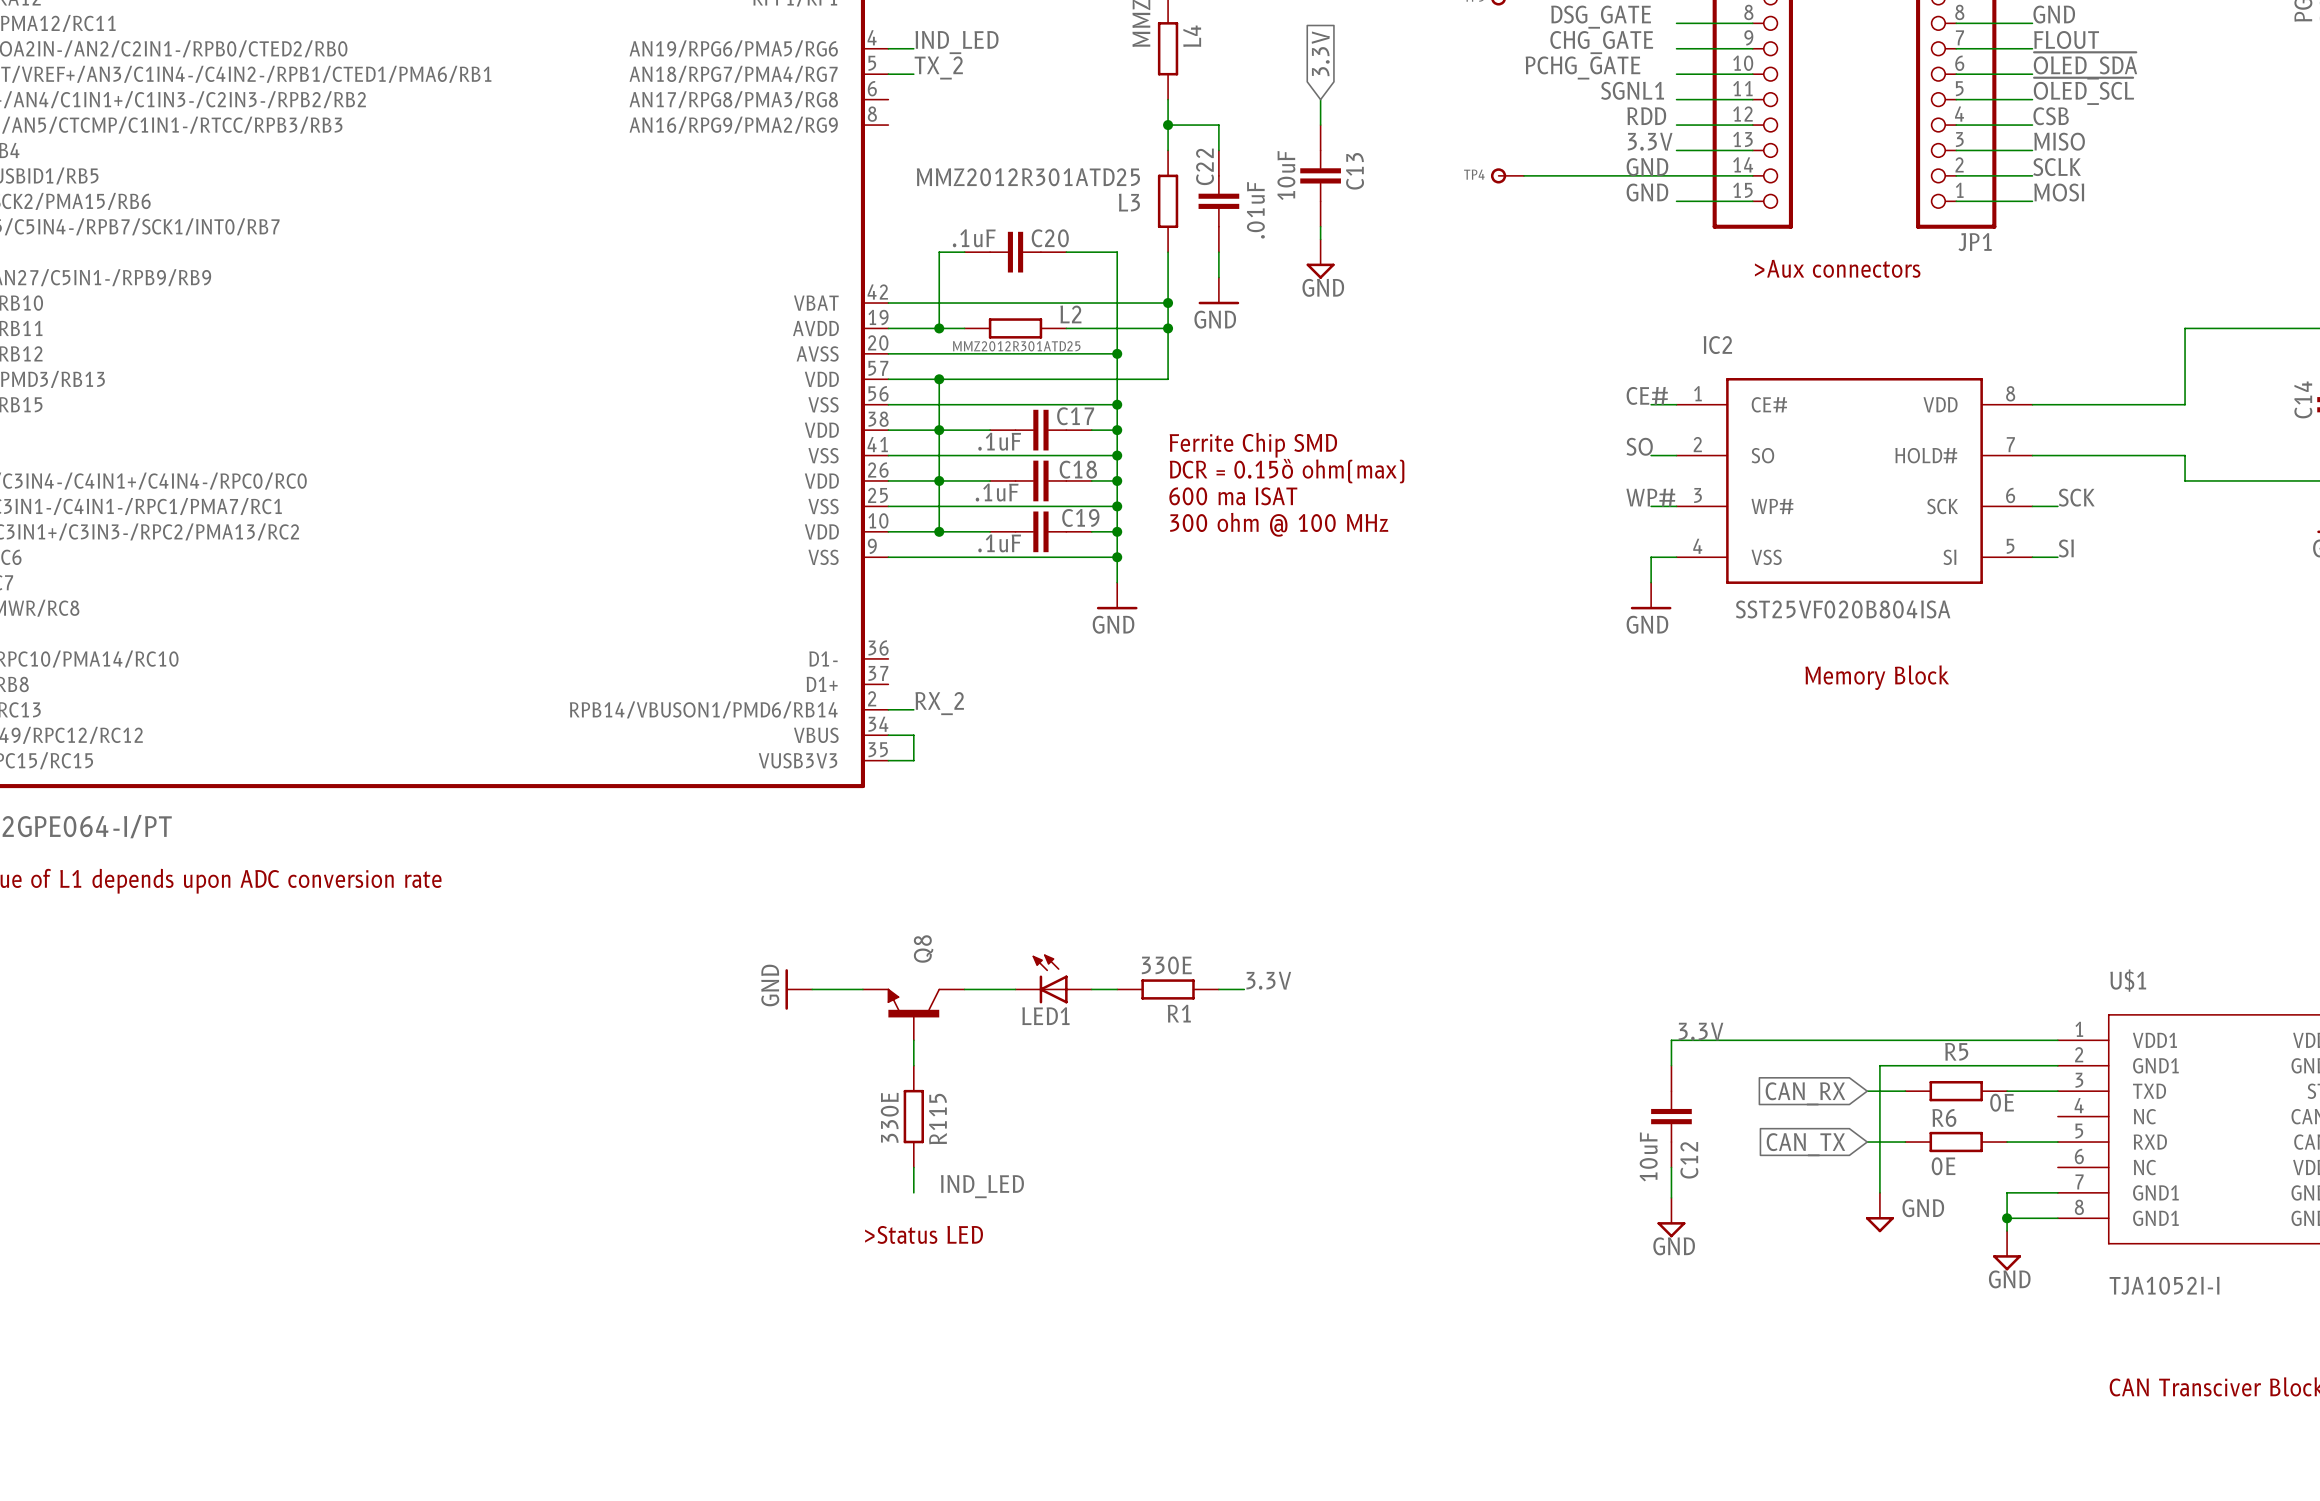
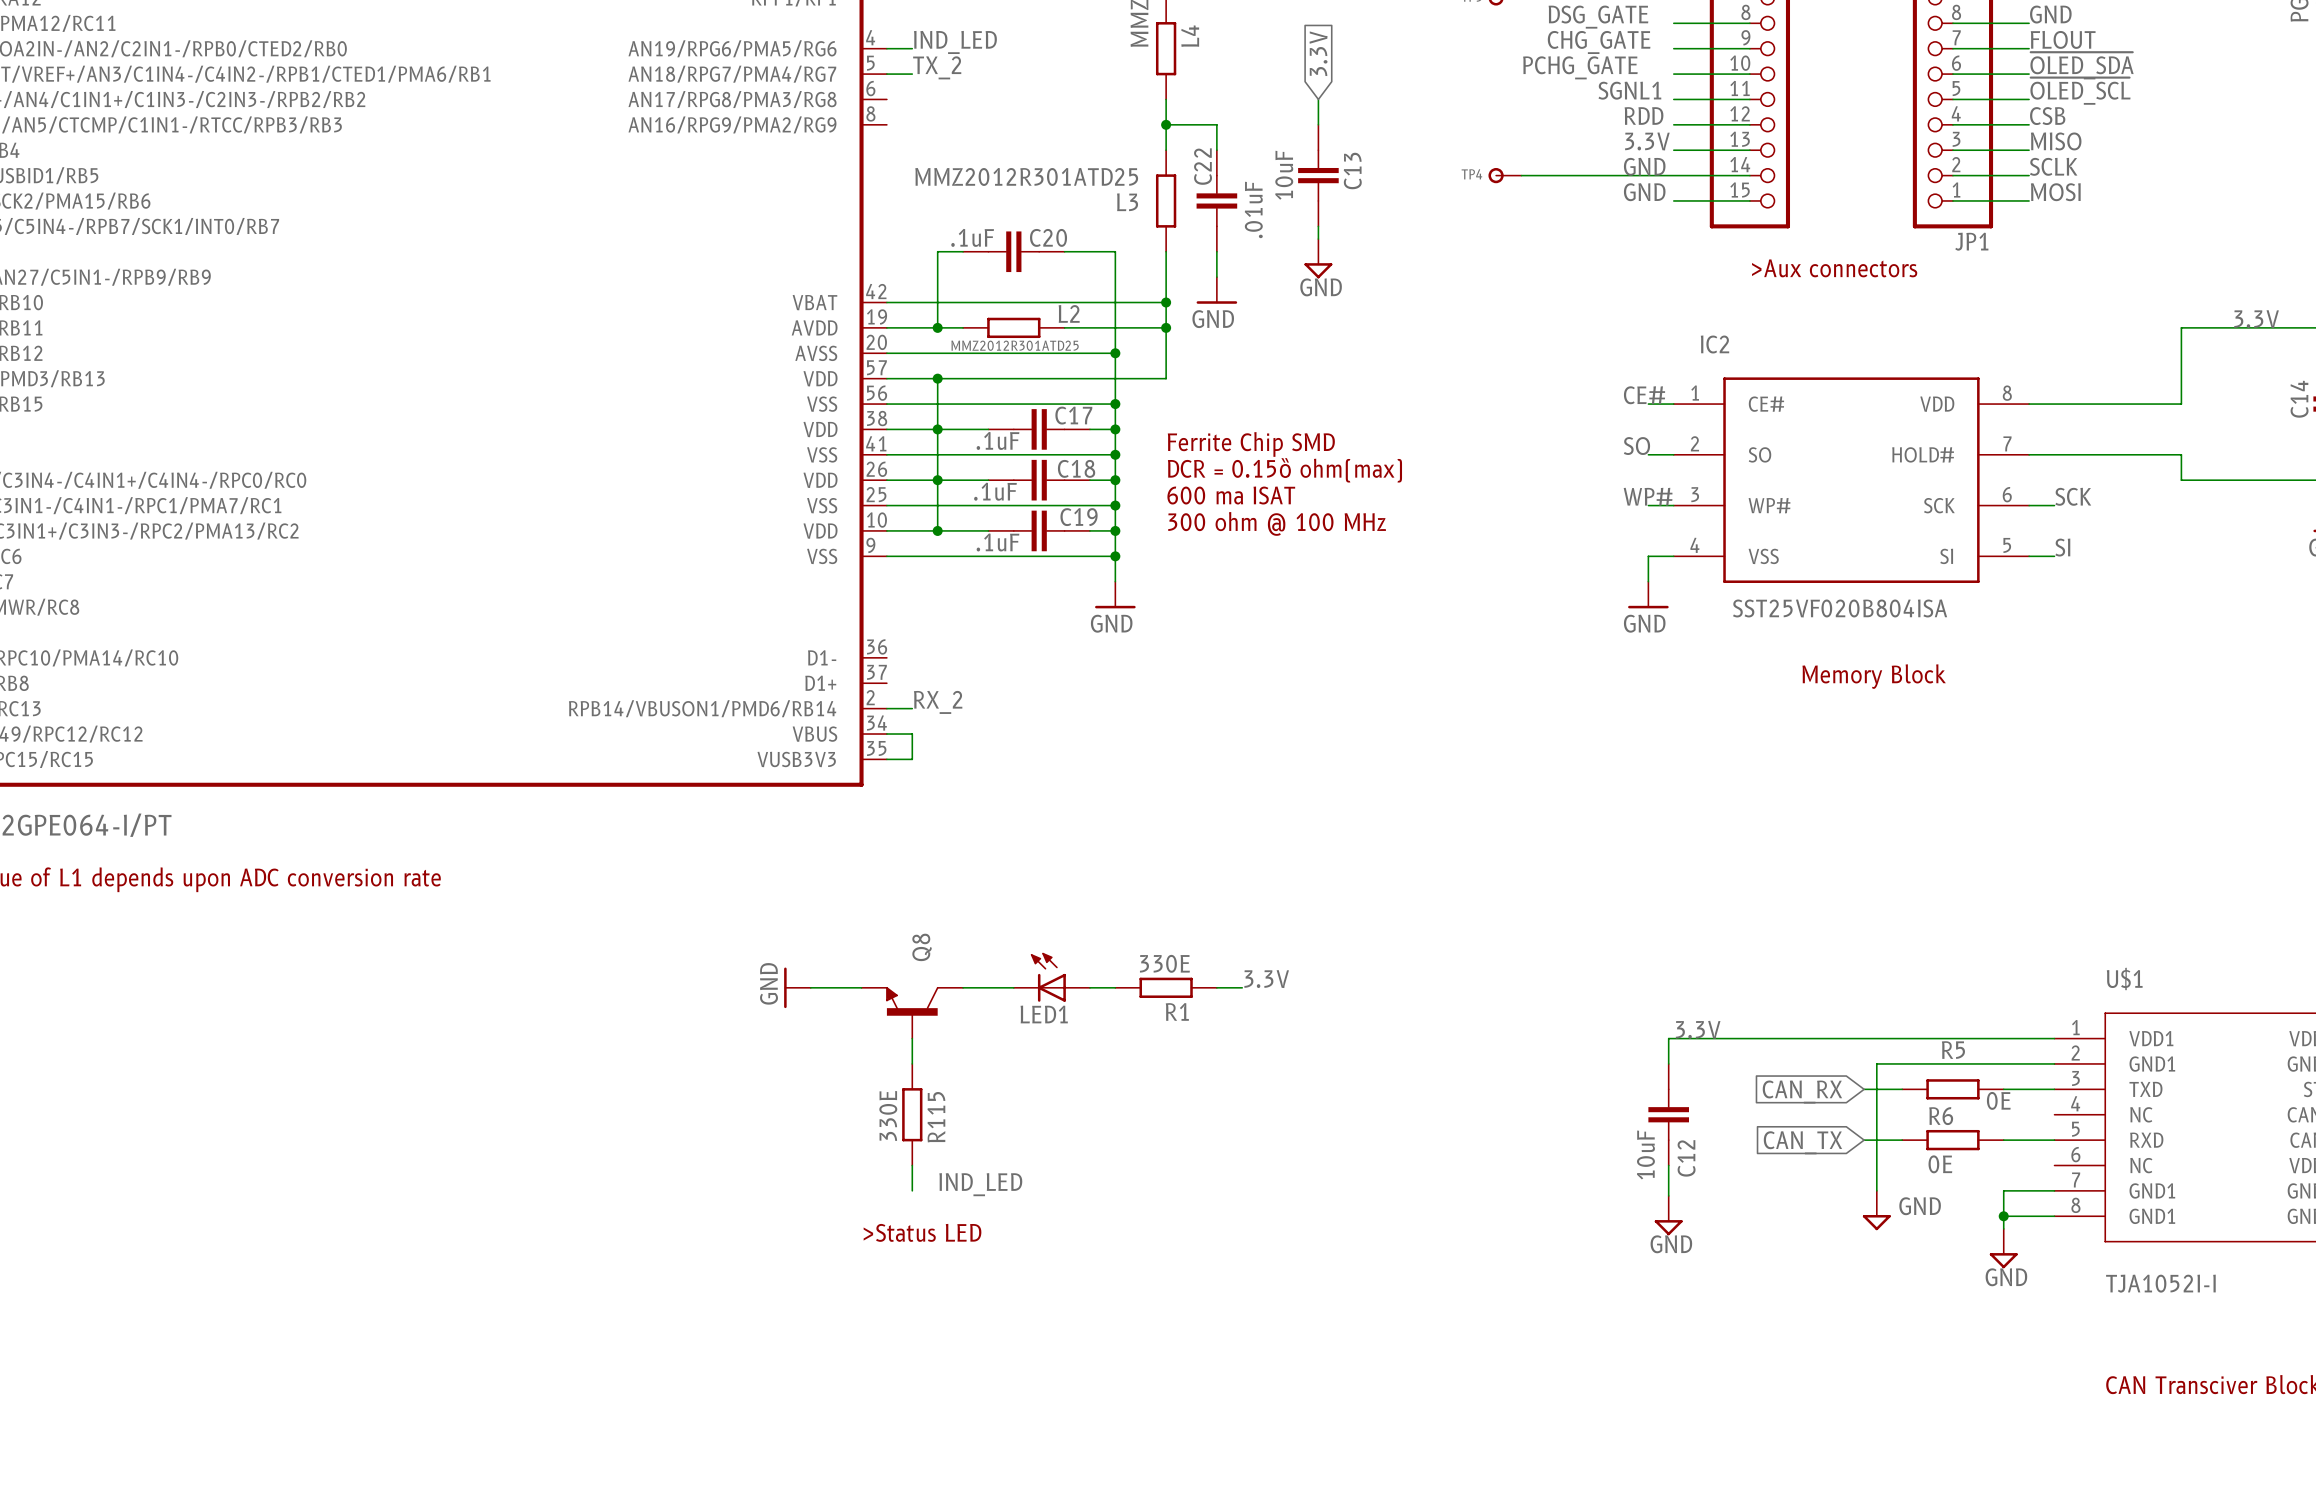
label: none -> 3.3V (2256, 319)

